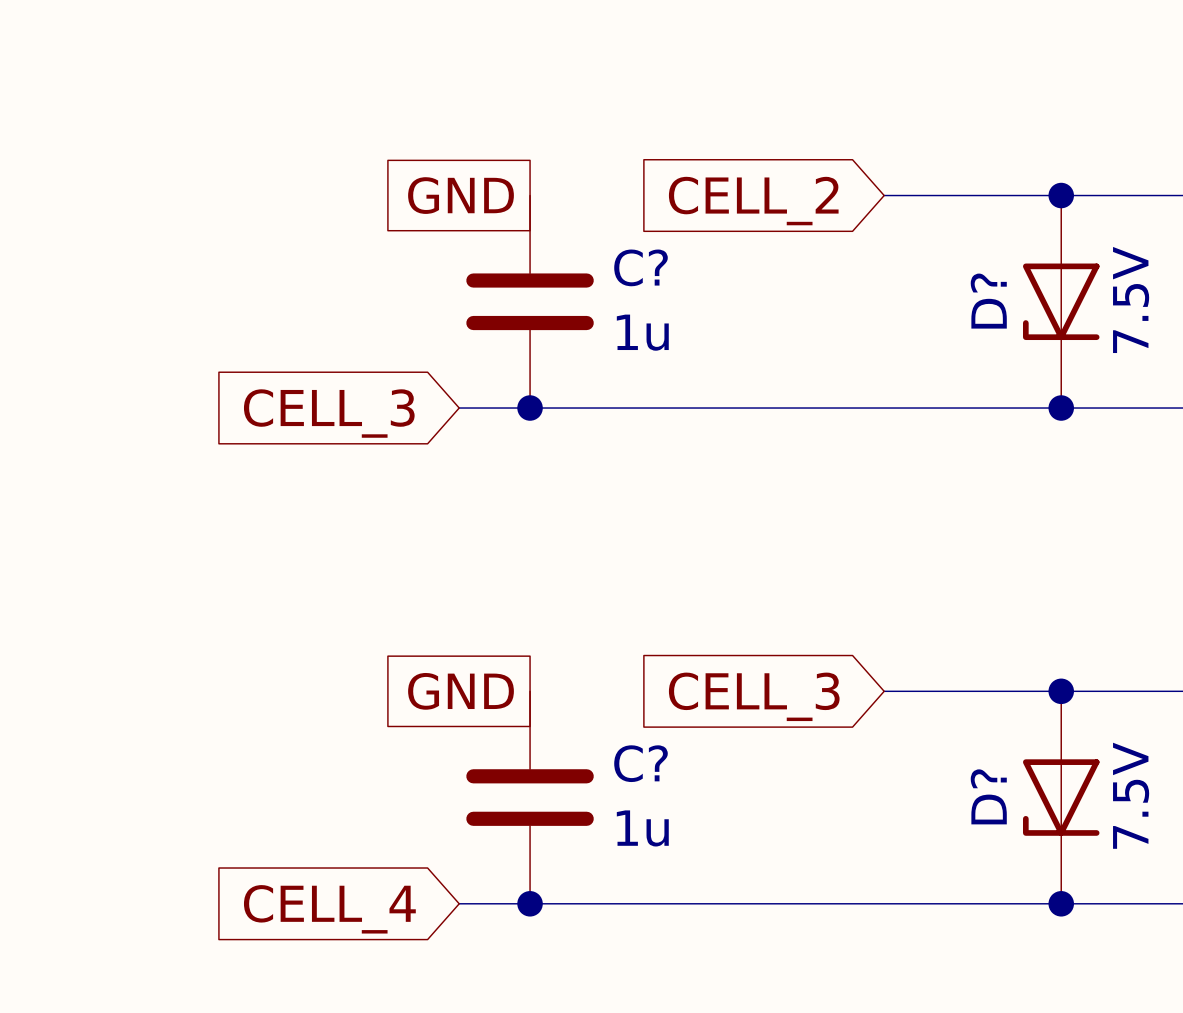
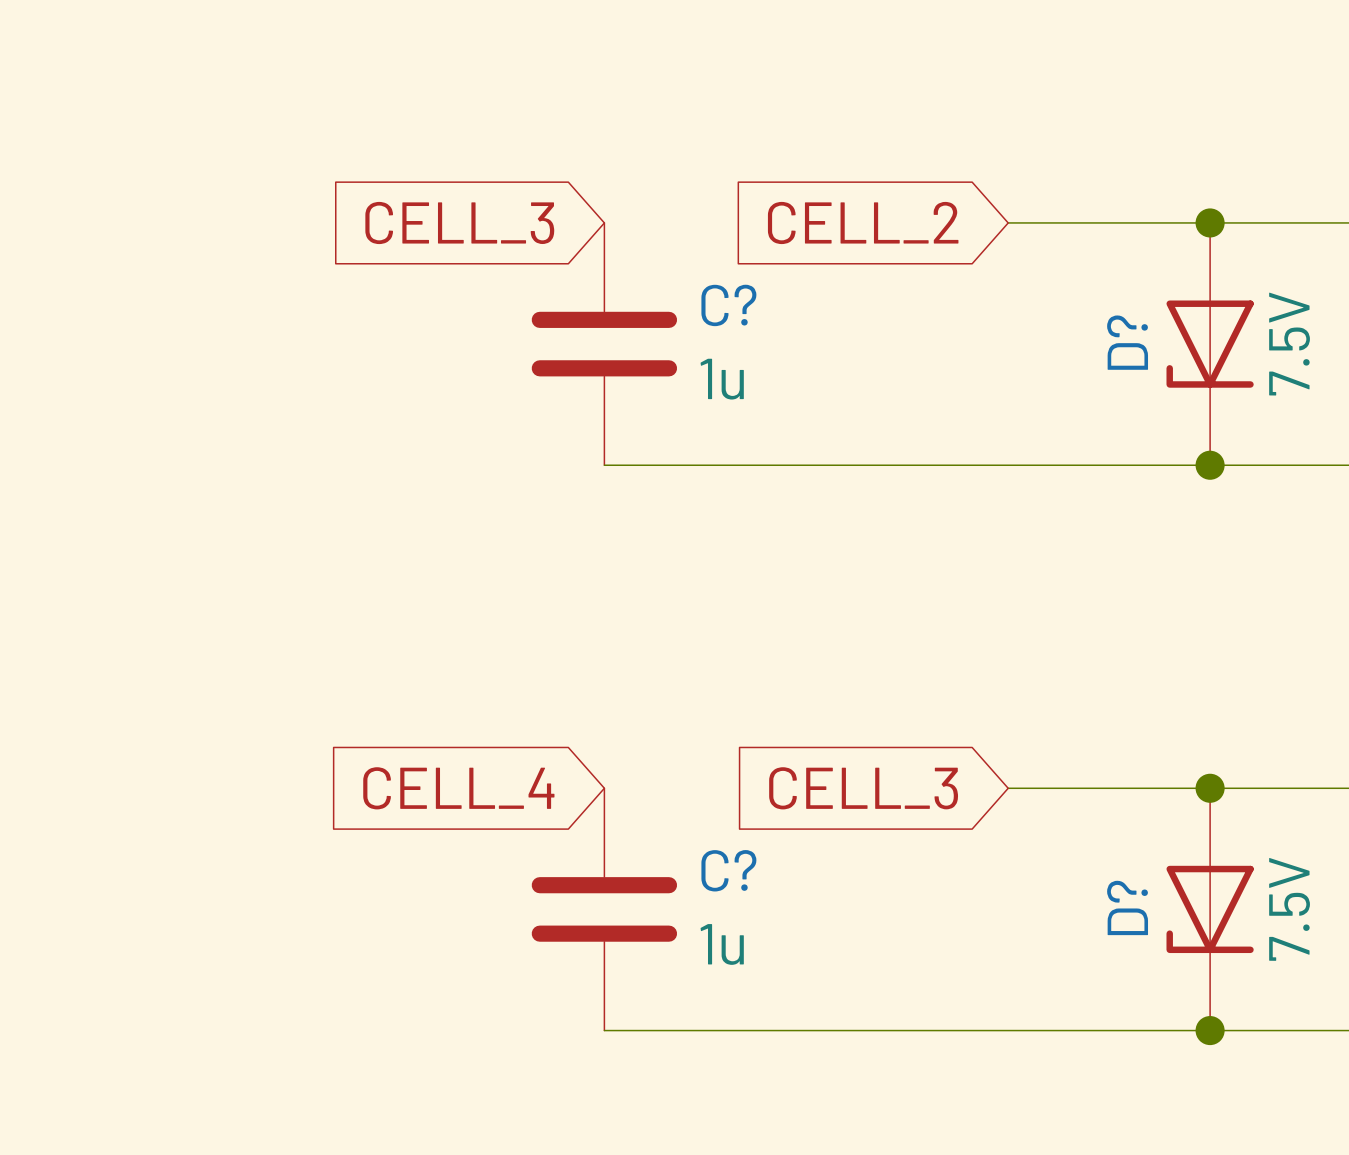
global label shape: passive (461, 195) -> input (459, 222)
global label: GND (461, 195) -> CELL_3 (459, 222)
wire: (459, 408) (530, 408) -> none
junction: (530, 408) -> none
global label: CELL_3 (329, 413) -> none
global label shape: passive (461, 691) -> input (458, 788)
global label: GND (461, 691) -> CELL_4 (458, 788)
wire: (459, 903) (530, 903) -> none
junction: (530, 903) -> none
global label: CELL_4 (329, 909) -> none

